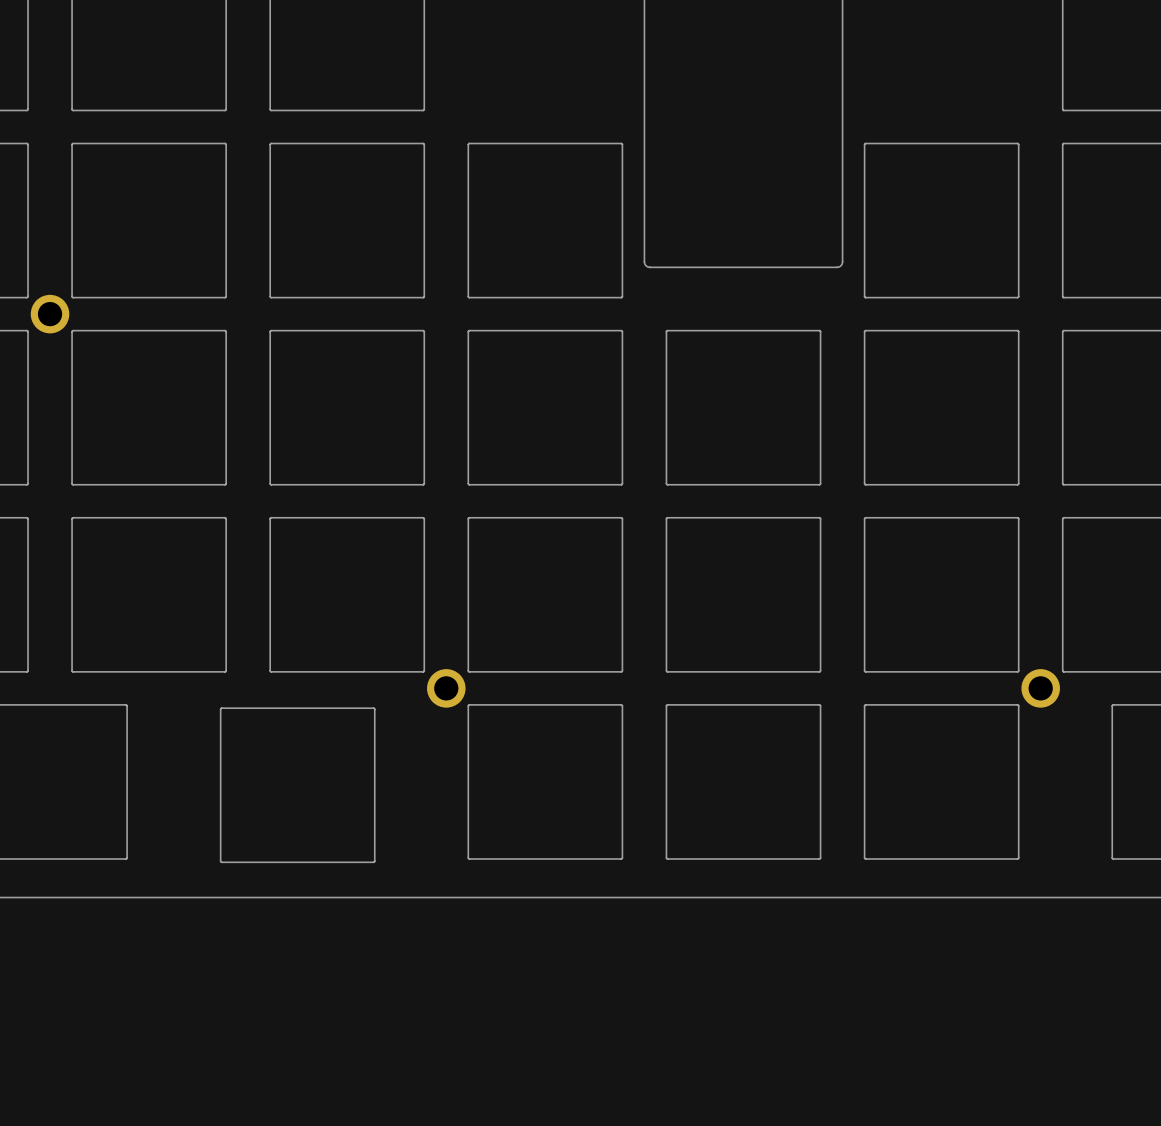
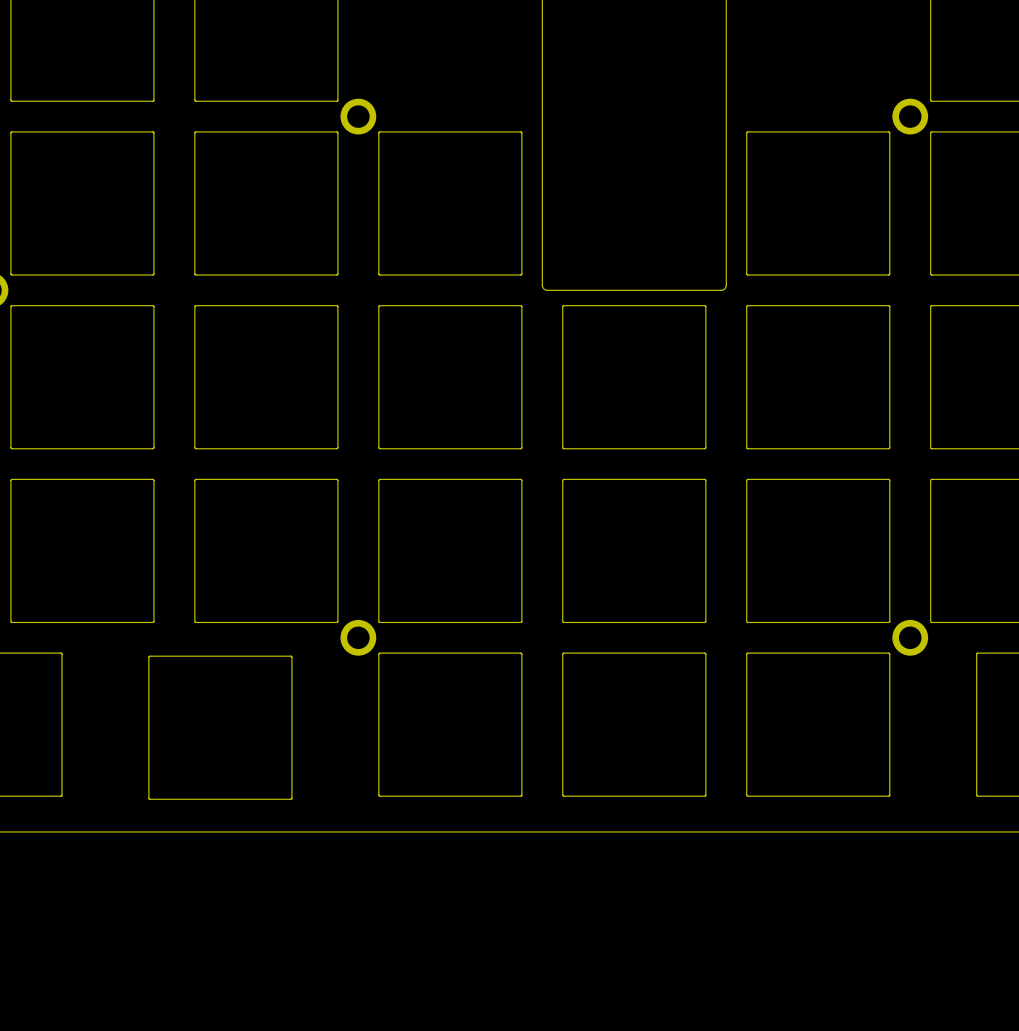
part: none -> (358, 116)
part: none -> (910, 116)
board edge: (644, 261) (646, 265) (649, 267) (837, 267) (840, 265) (842, 261) -> (542, 241) (542, 285) (547, 290) (722, 290) (726, 285) (726, 241)

